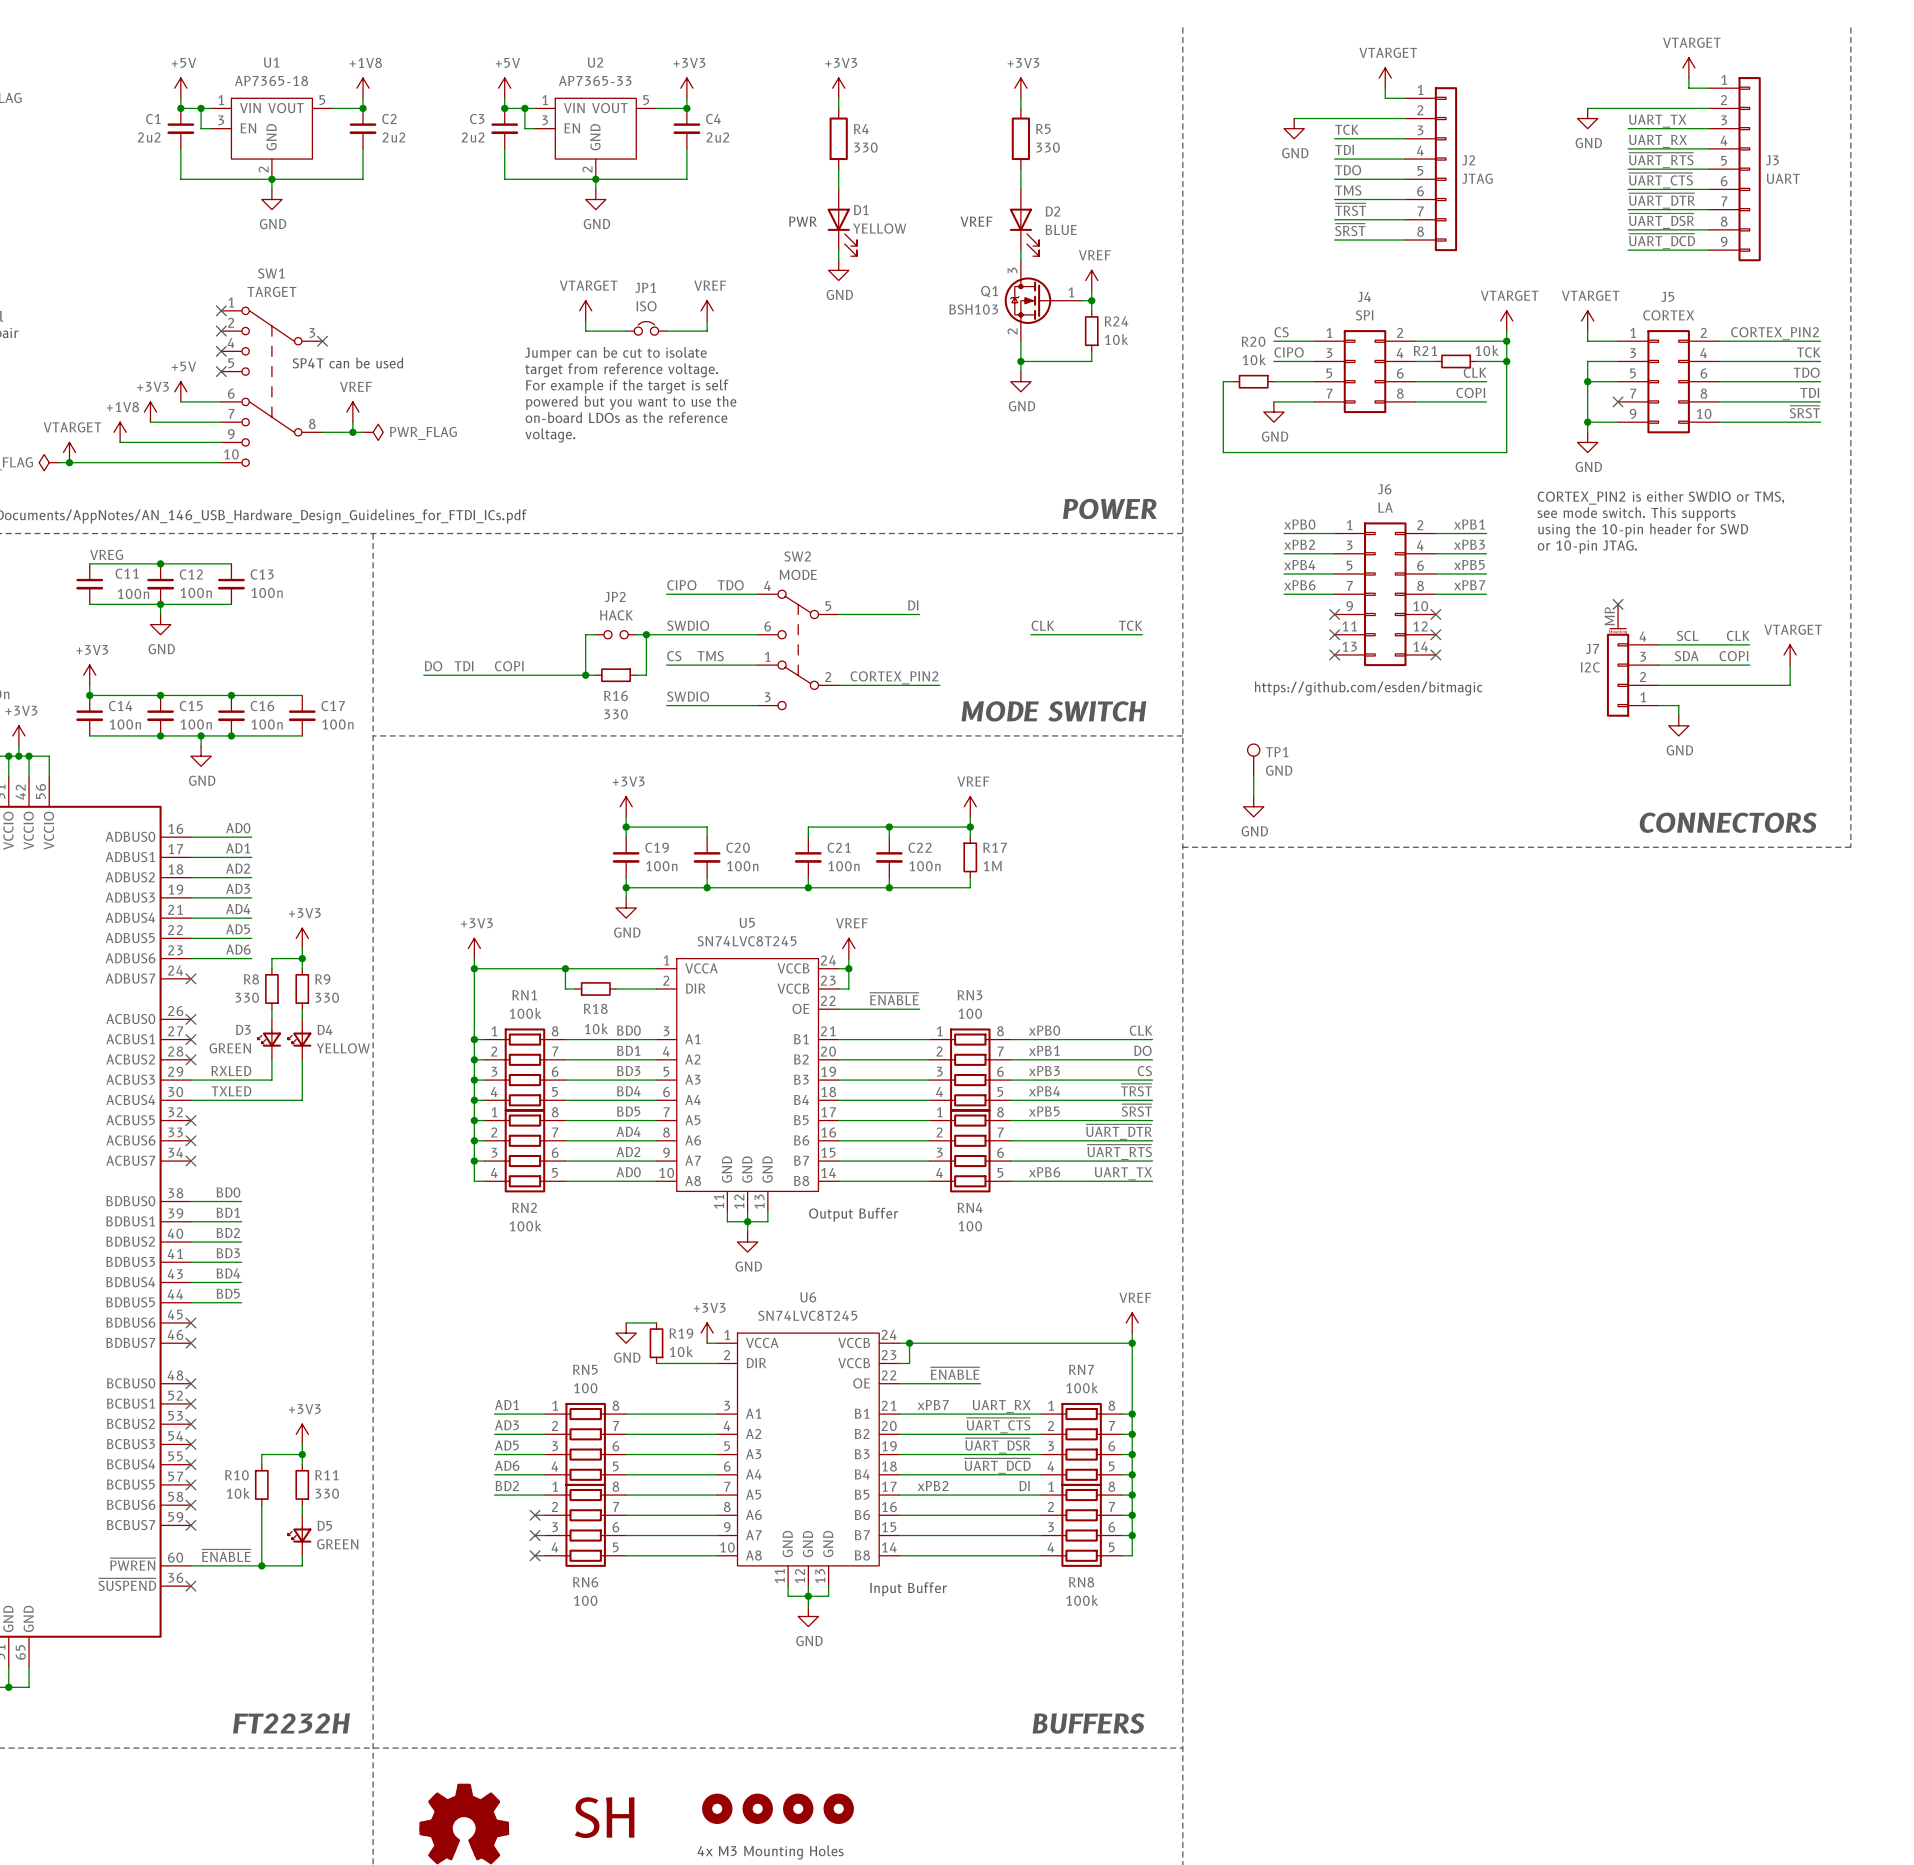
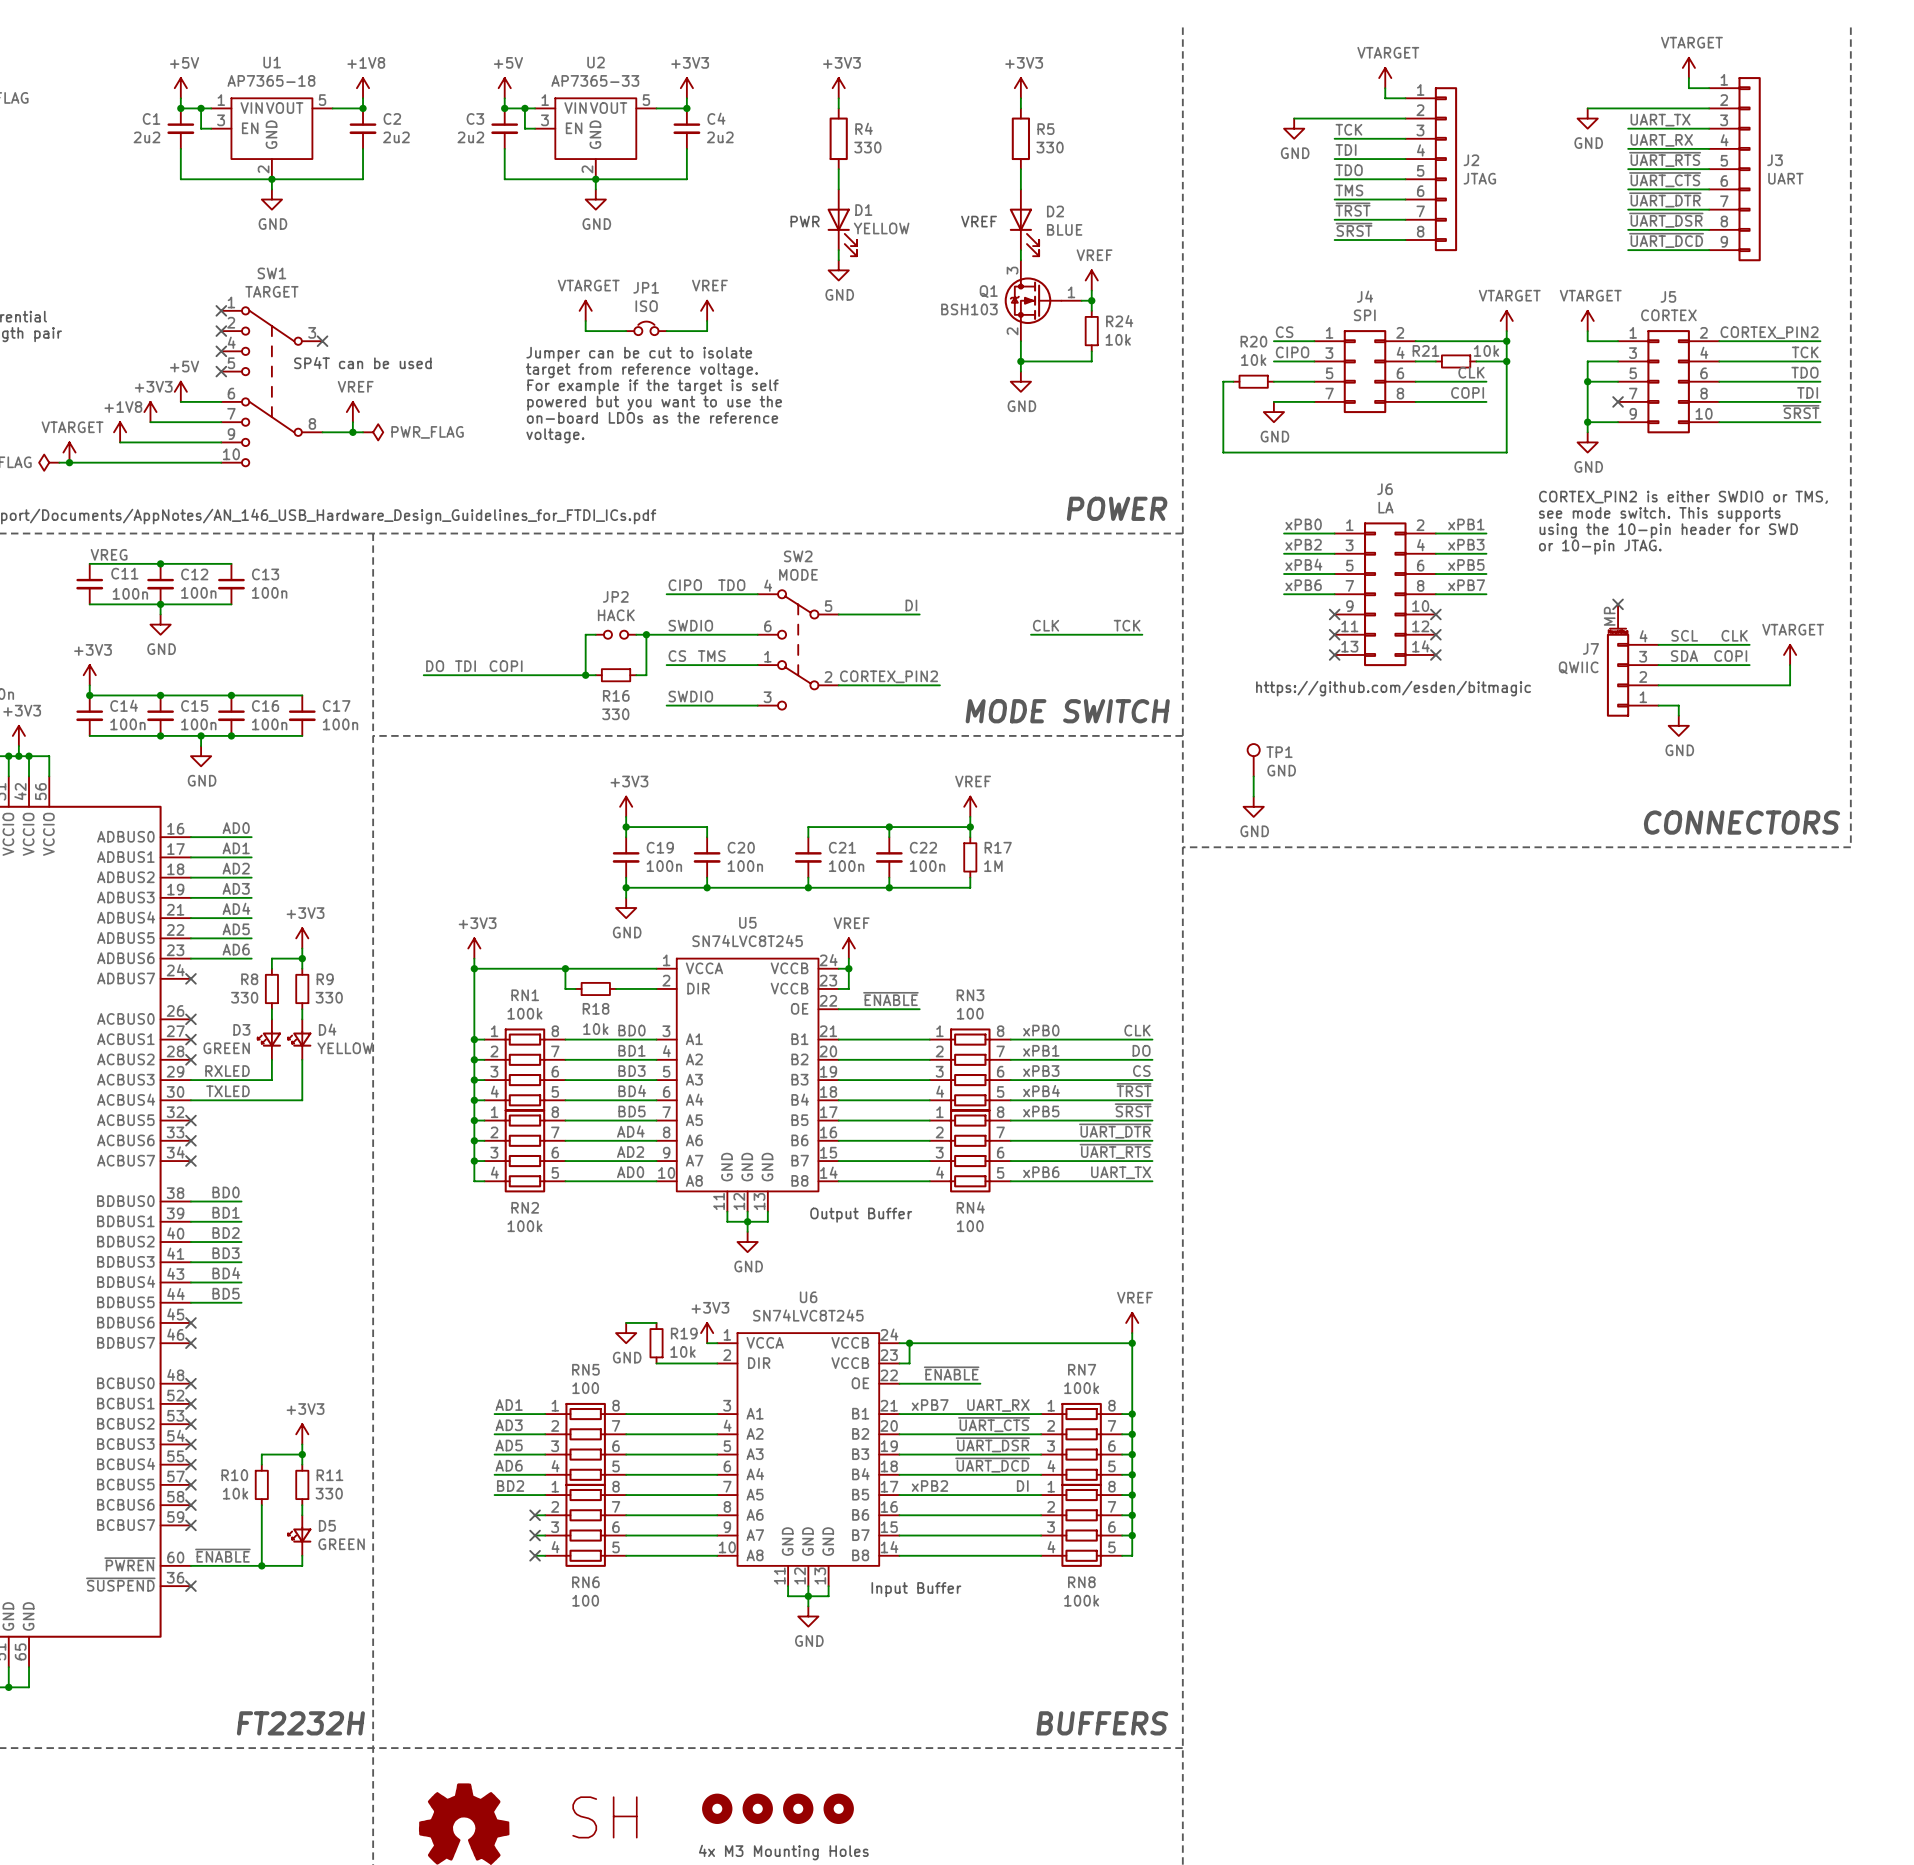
J7 value: I2C (1590, 667) -> QWIIC (1578, 667)

